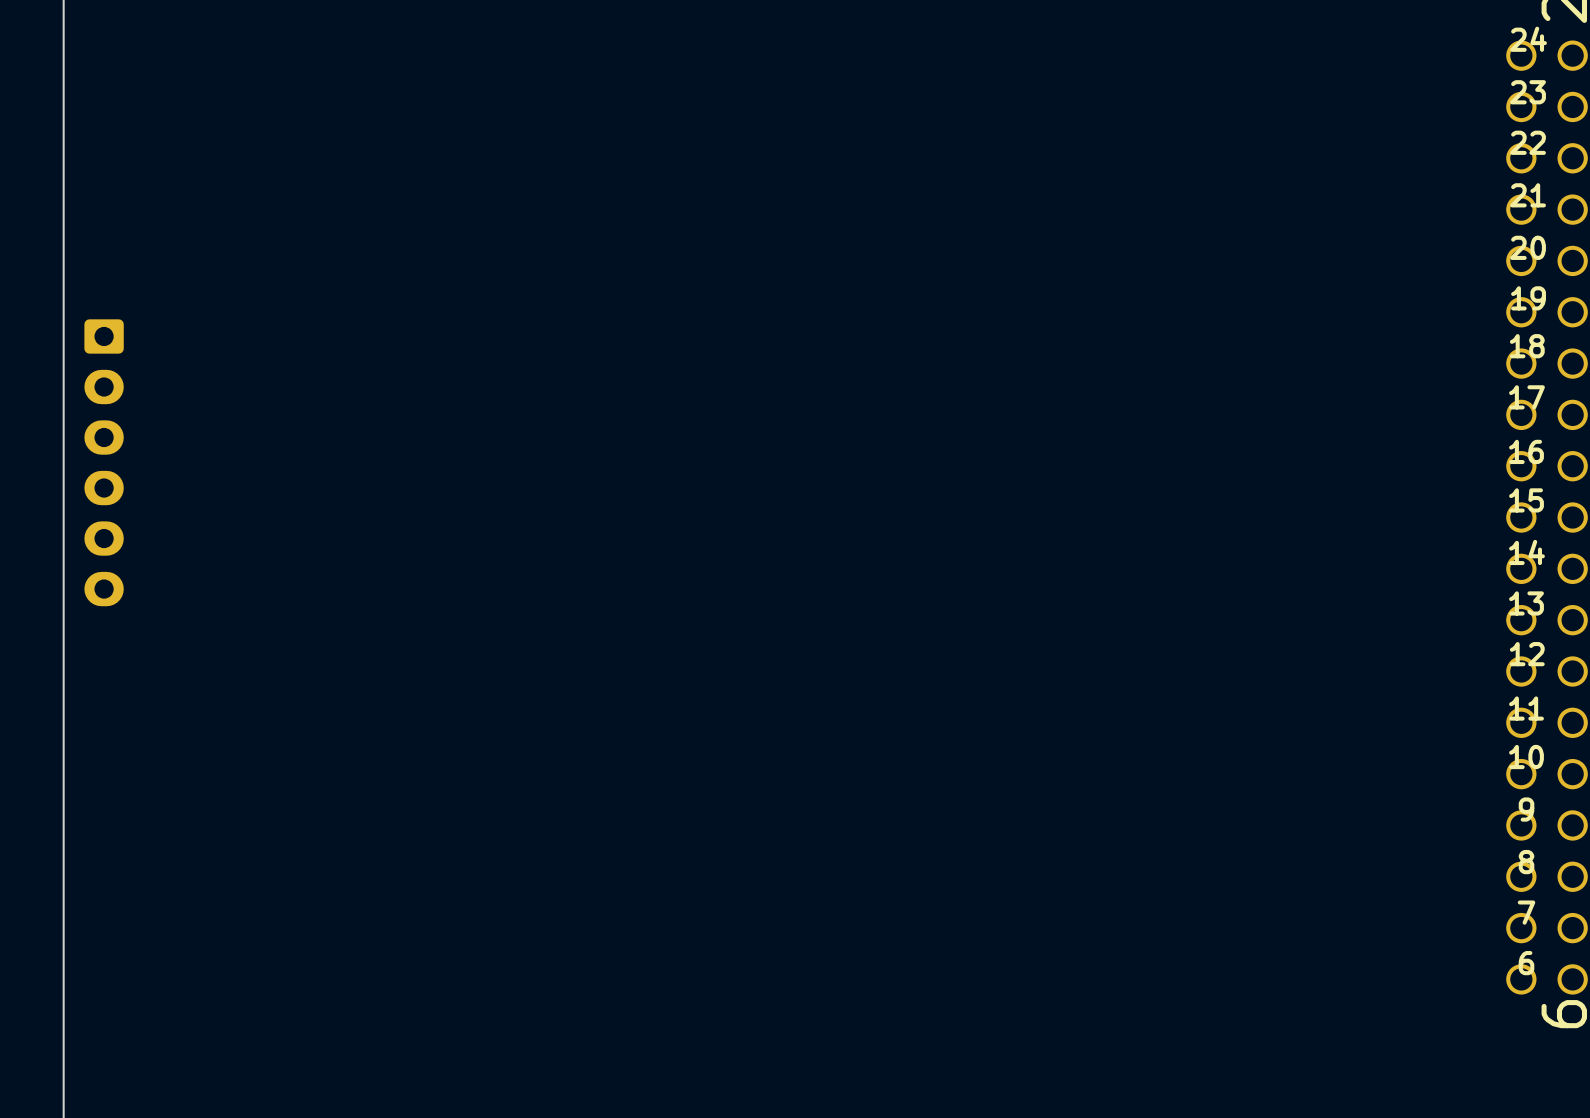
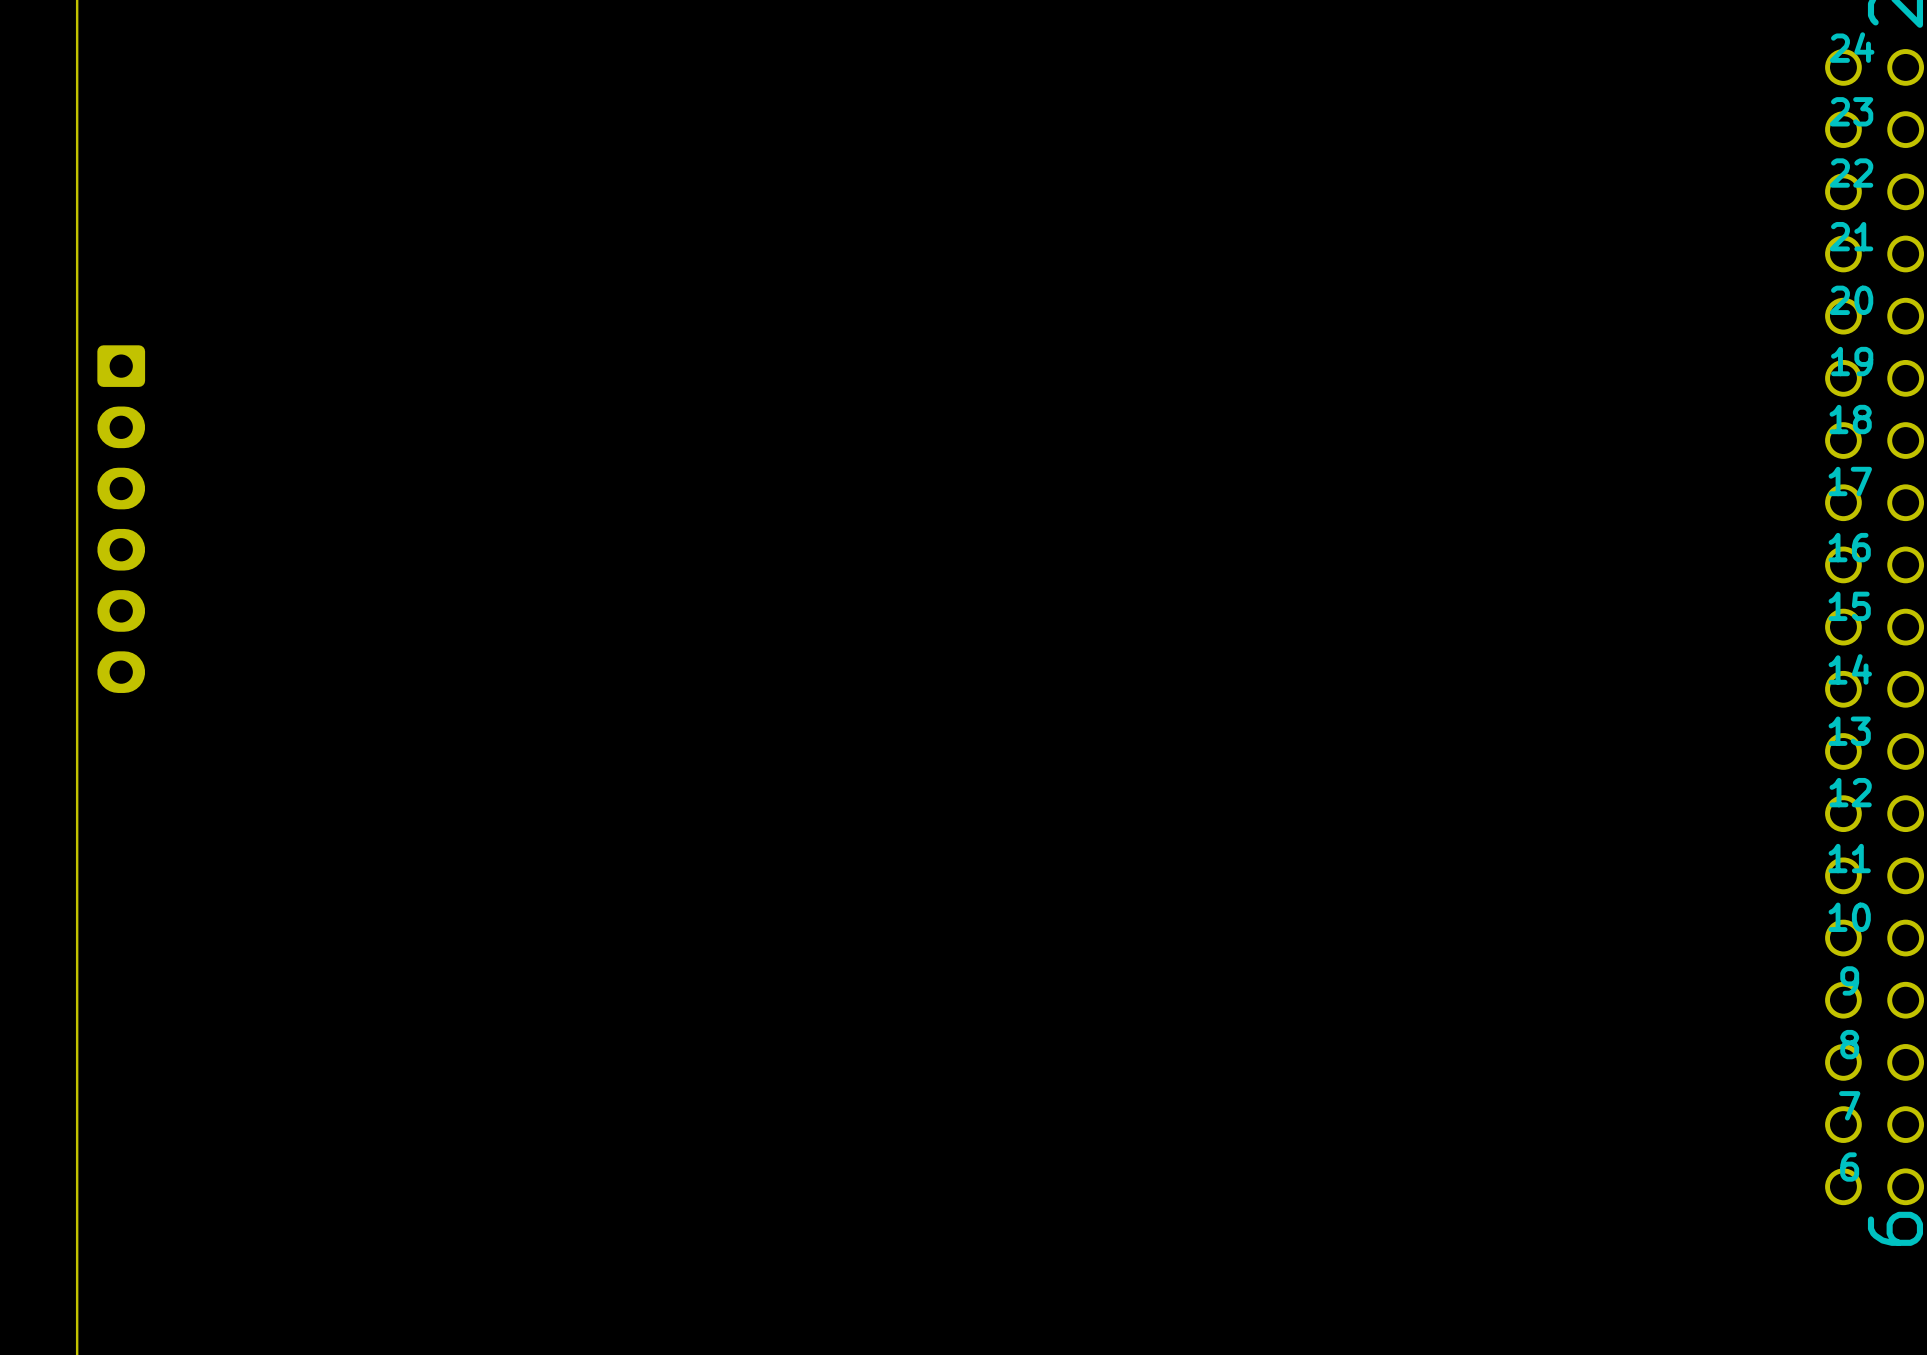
part position: (104, 462) -> (121, 519)

